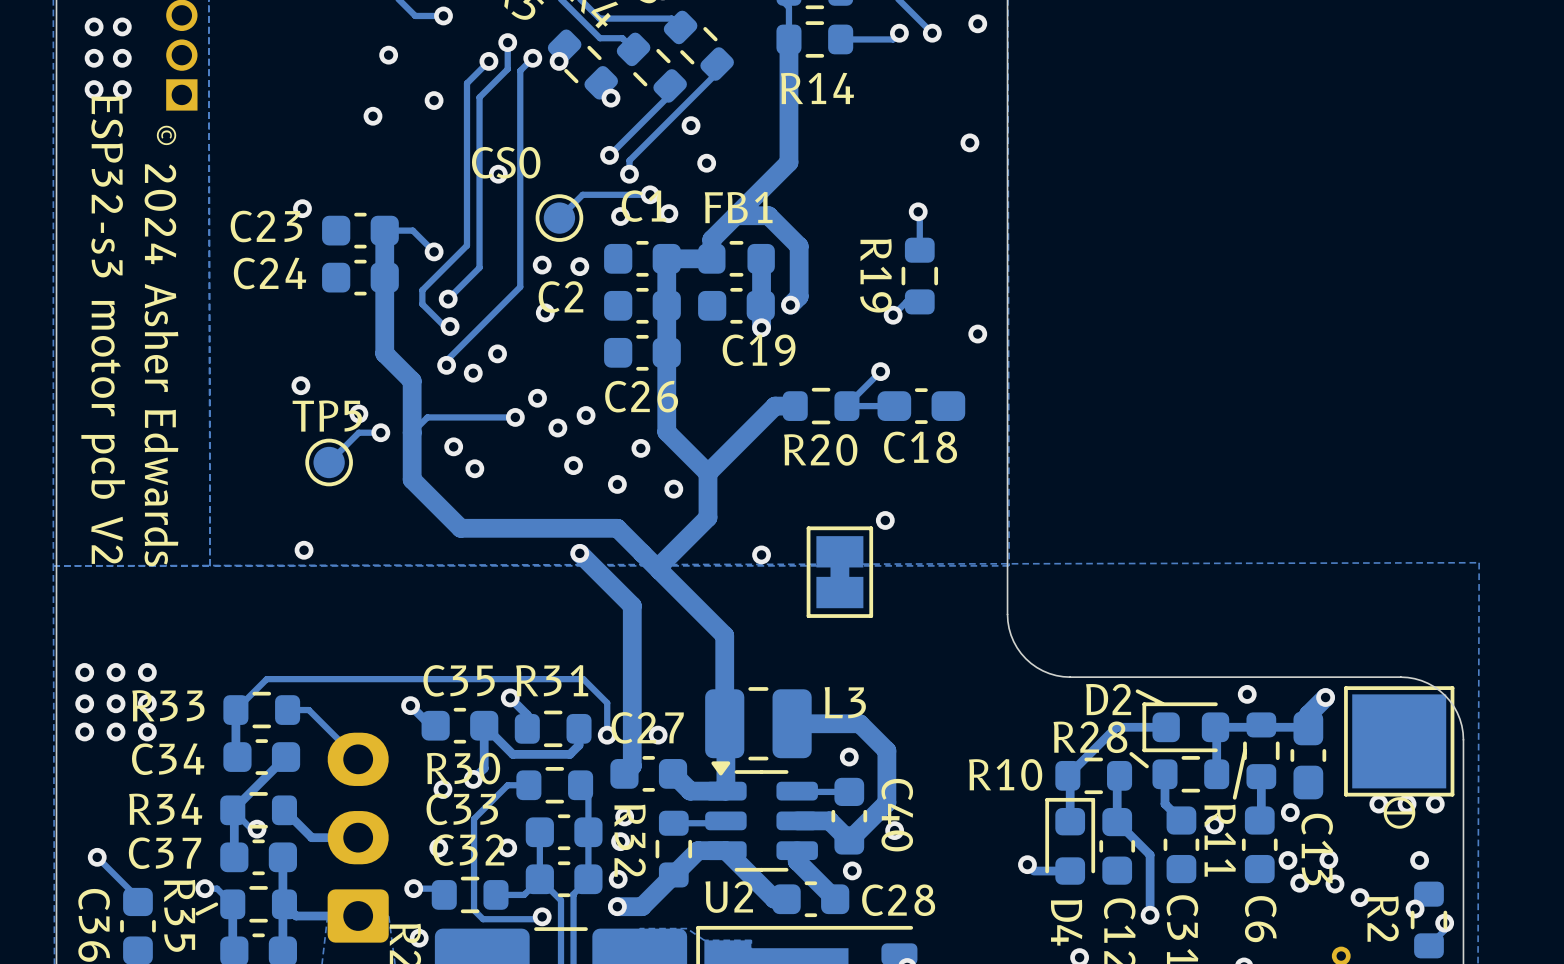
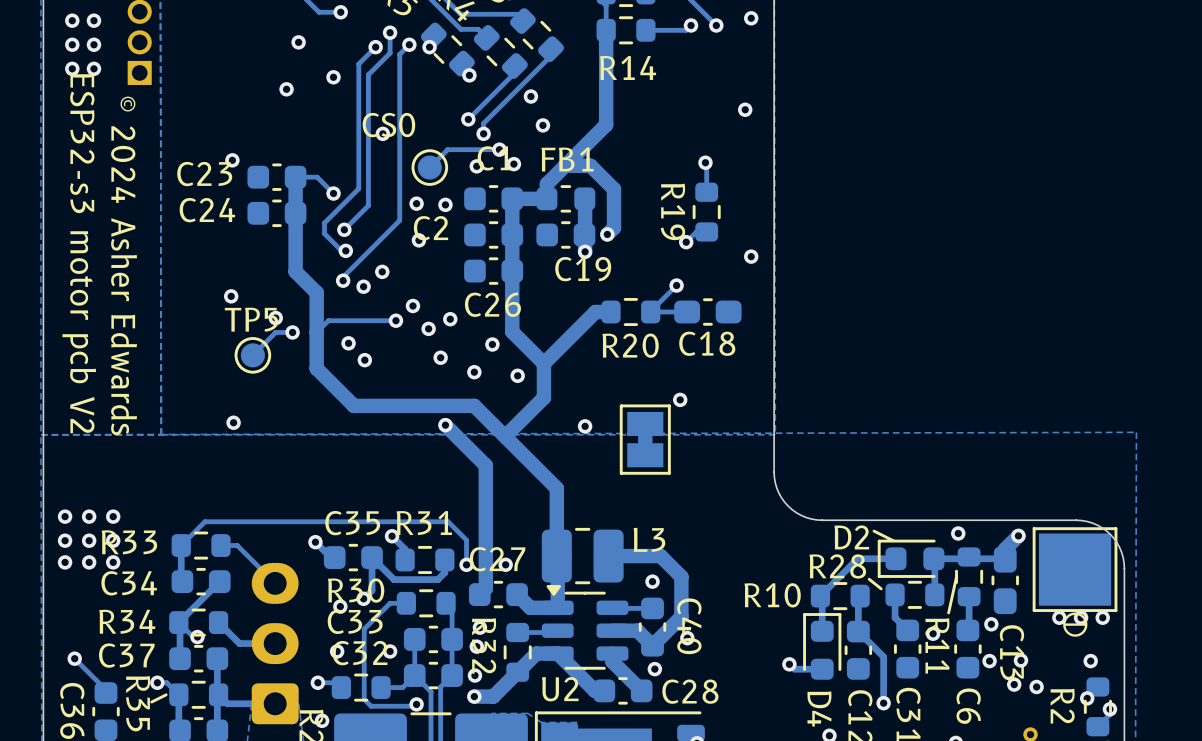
via: (1299, 883) -> none
via: (1334, 884) -> none
via: none -> (1014, 684)
via: none -> (1036, 686)
via: (1360, 897) -> none

